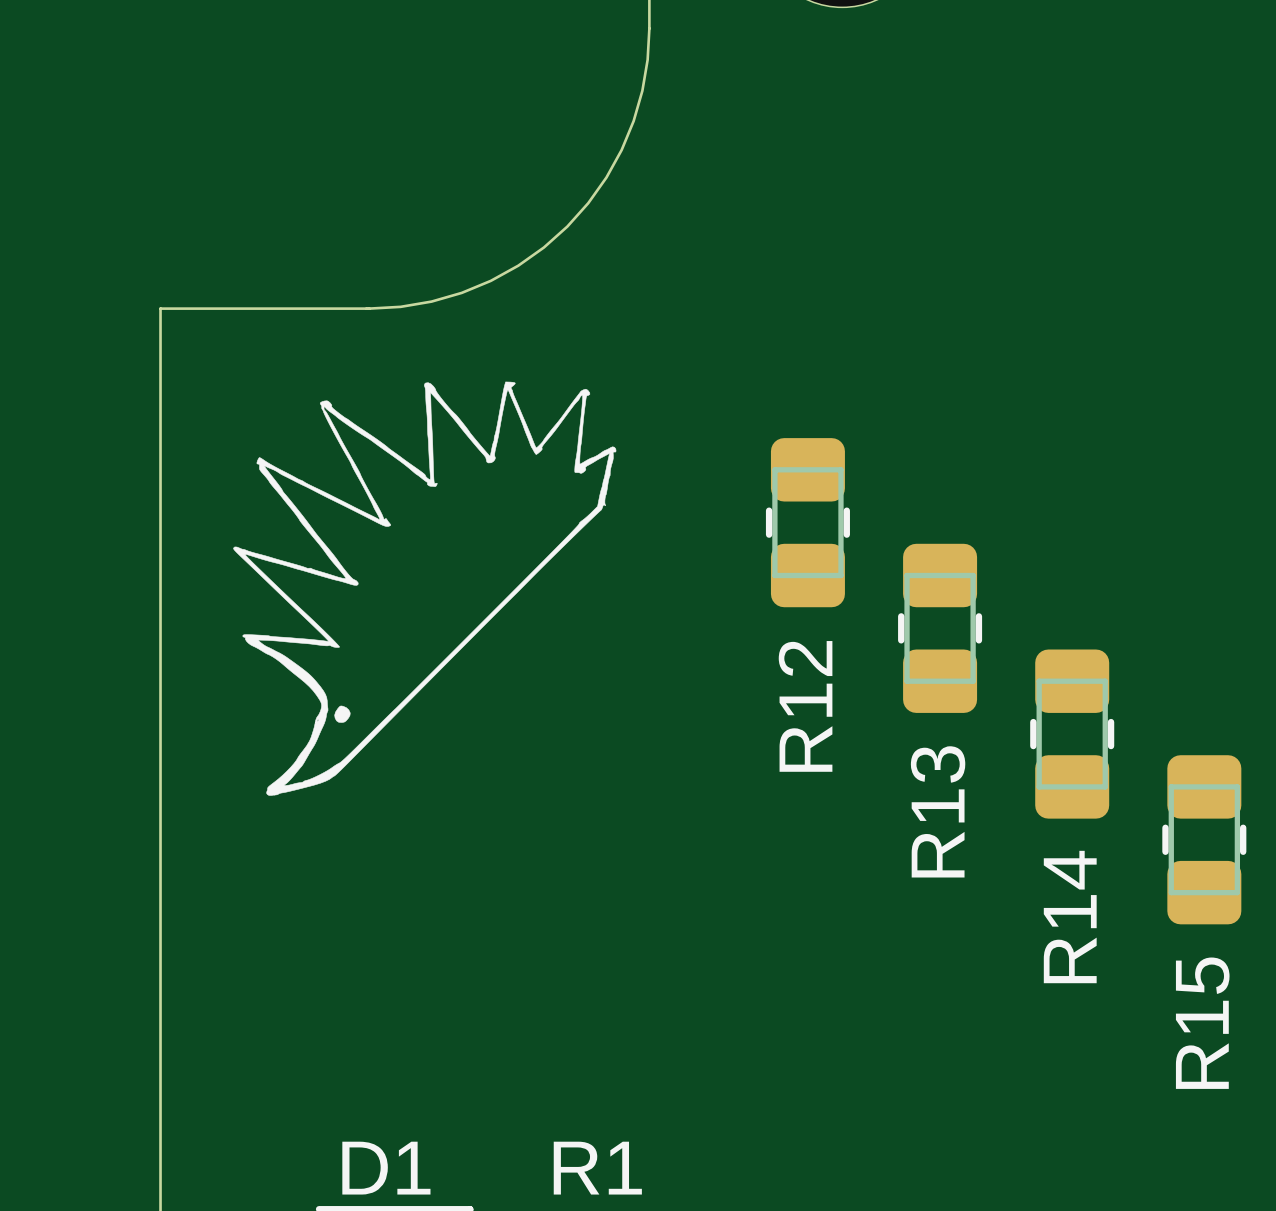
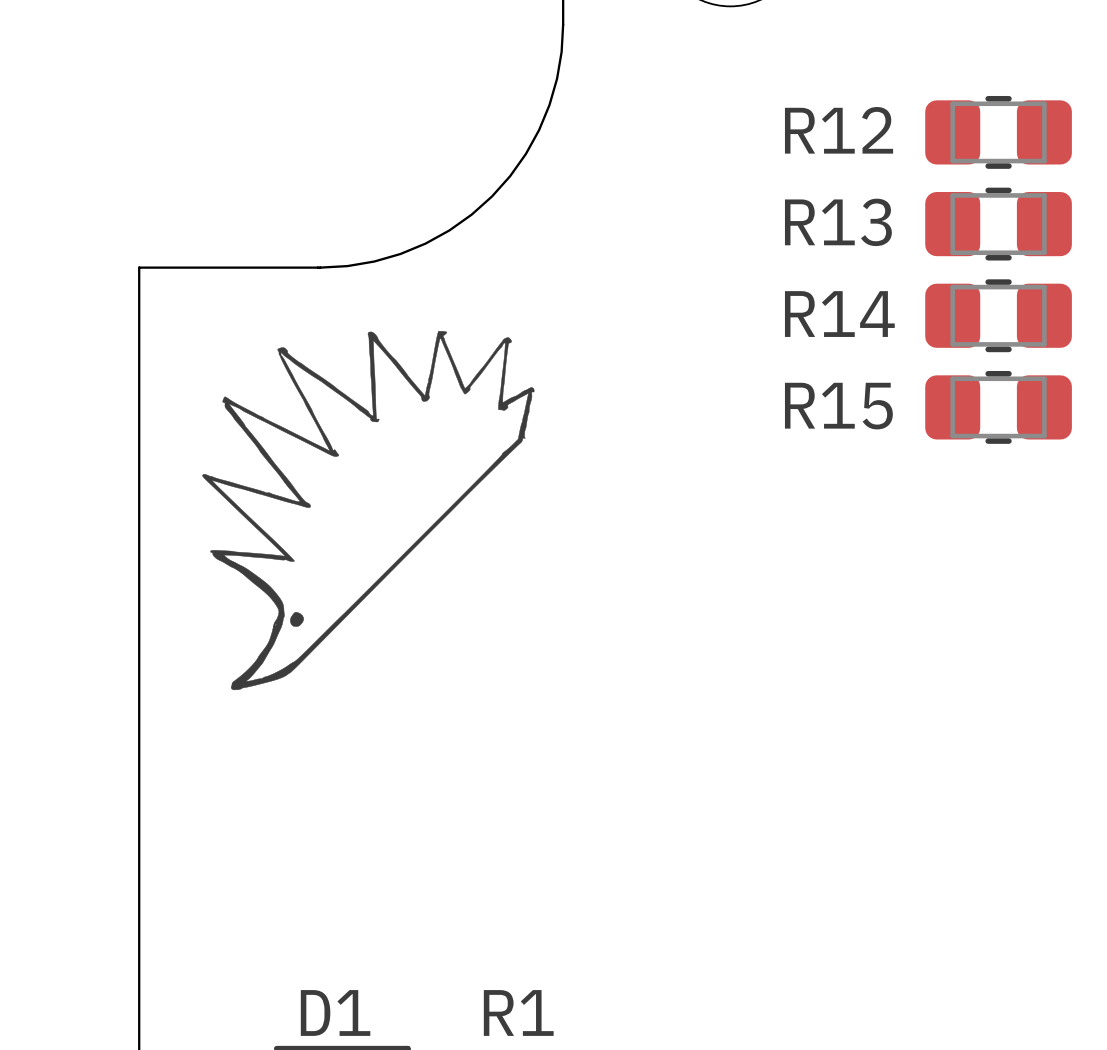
R12 rotation: 0° (807, 522) -> 90° clockwise (998, 132)
R12 position: (807, 522) -> (998, 132)
R13 rotation: 0° (940, 628) -> 90° clockwise (998, 224)
R13 position: (940, 628) -> (998, 224)
R14 rotation: 0° (1072, 734) -> 90° clockwise (998, 315)
R14 position: (1072, 734) -> (998, 315)
R15 rotation: 0° (1204, 839) -> 90° clockwise (998, 407)
R15 position: (1204, 839) -> (998, 407)

